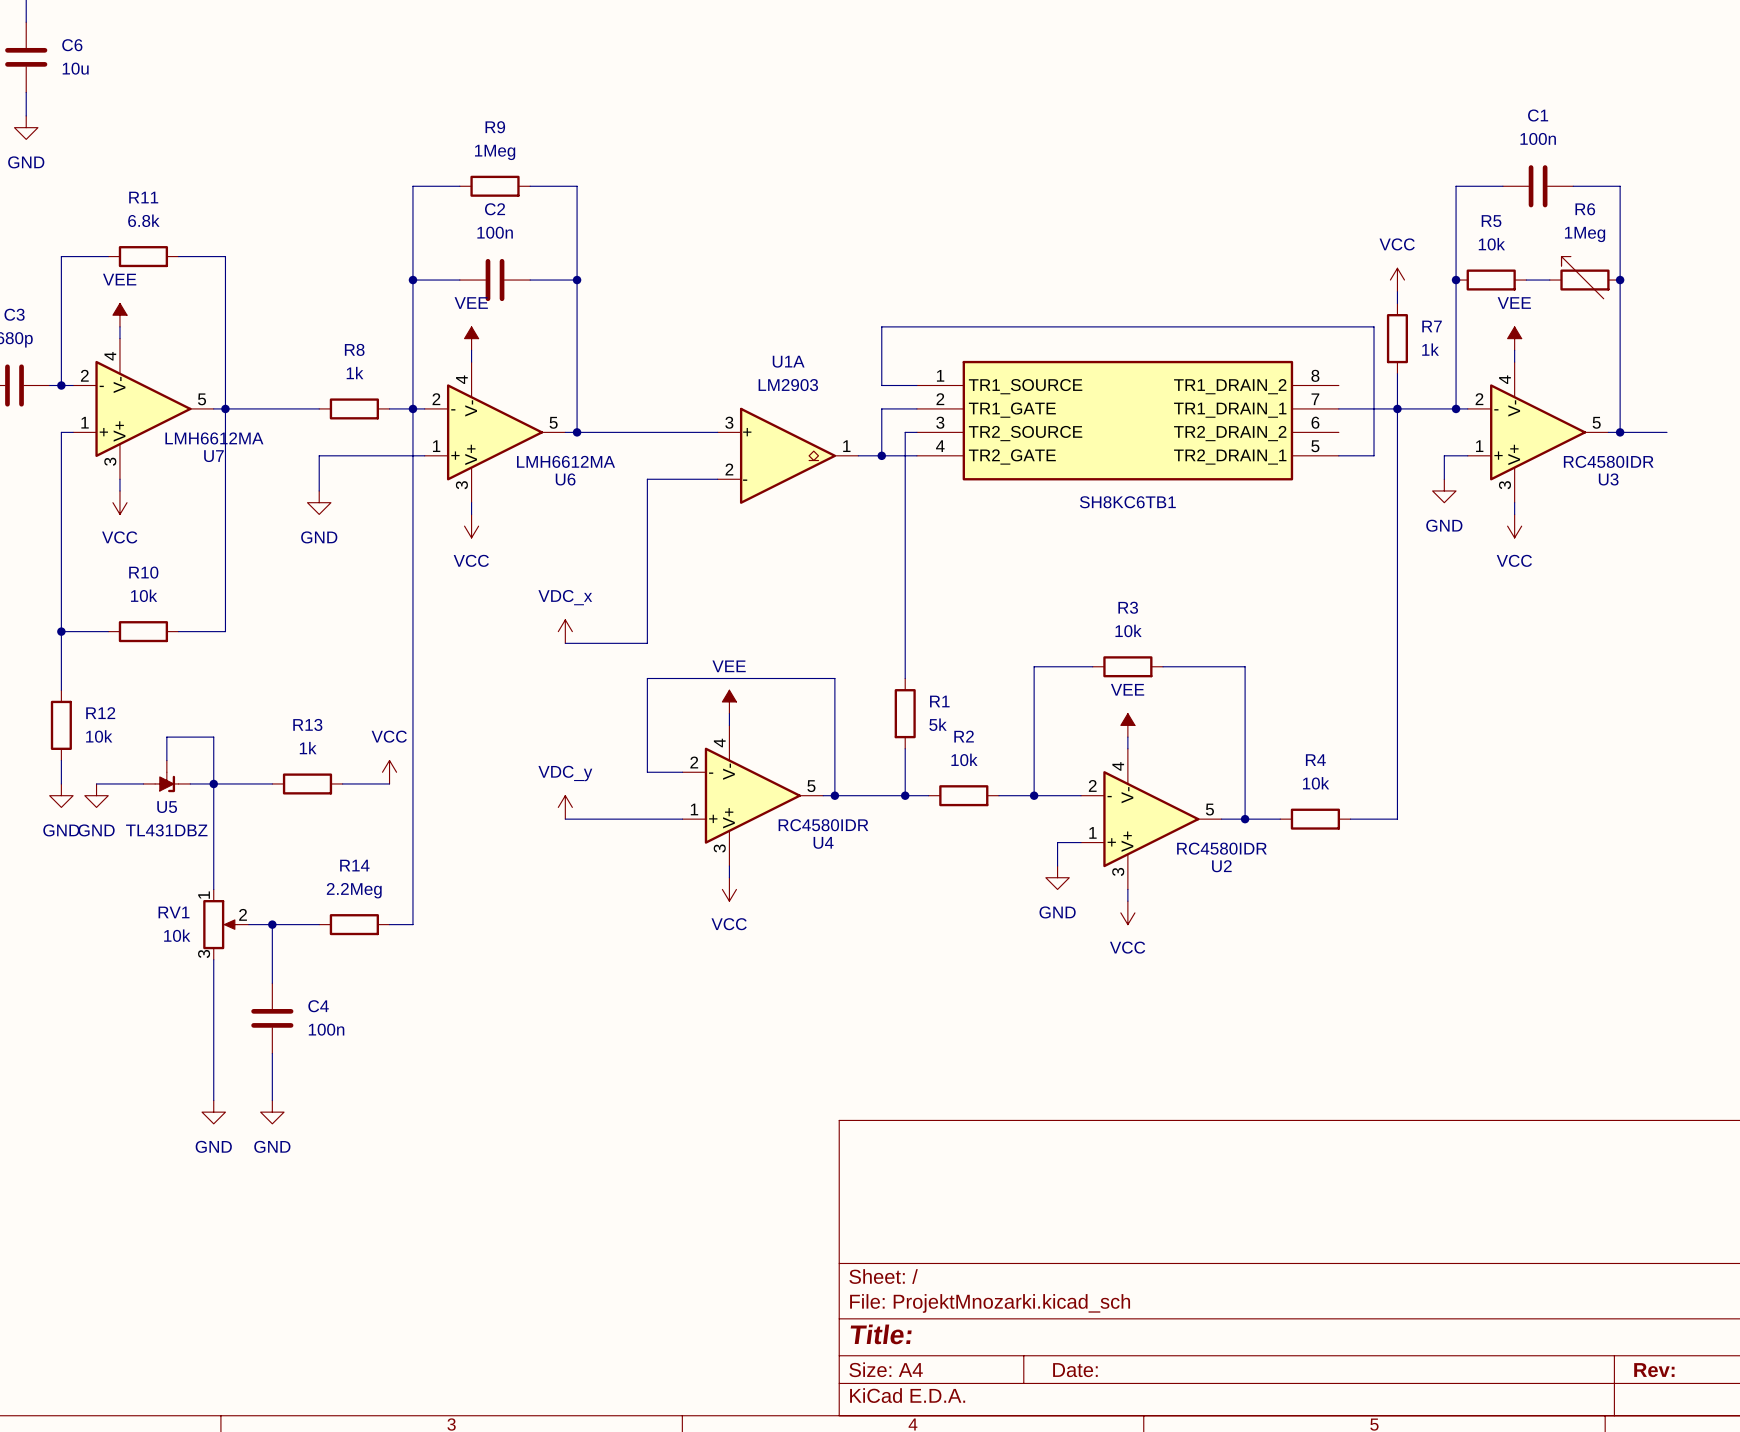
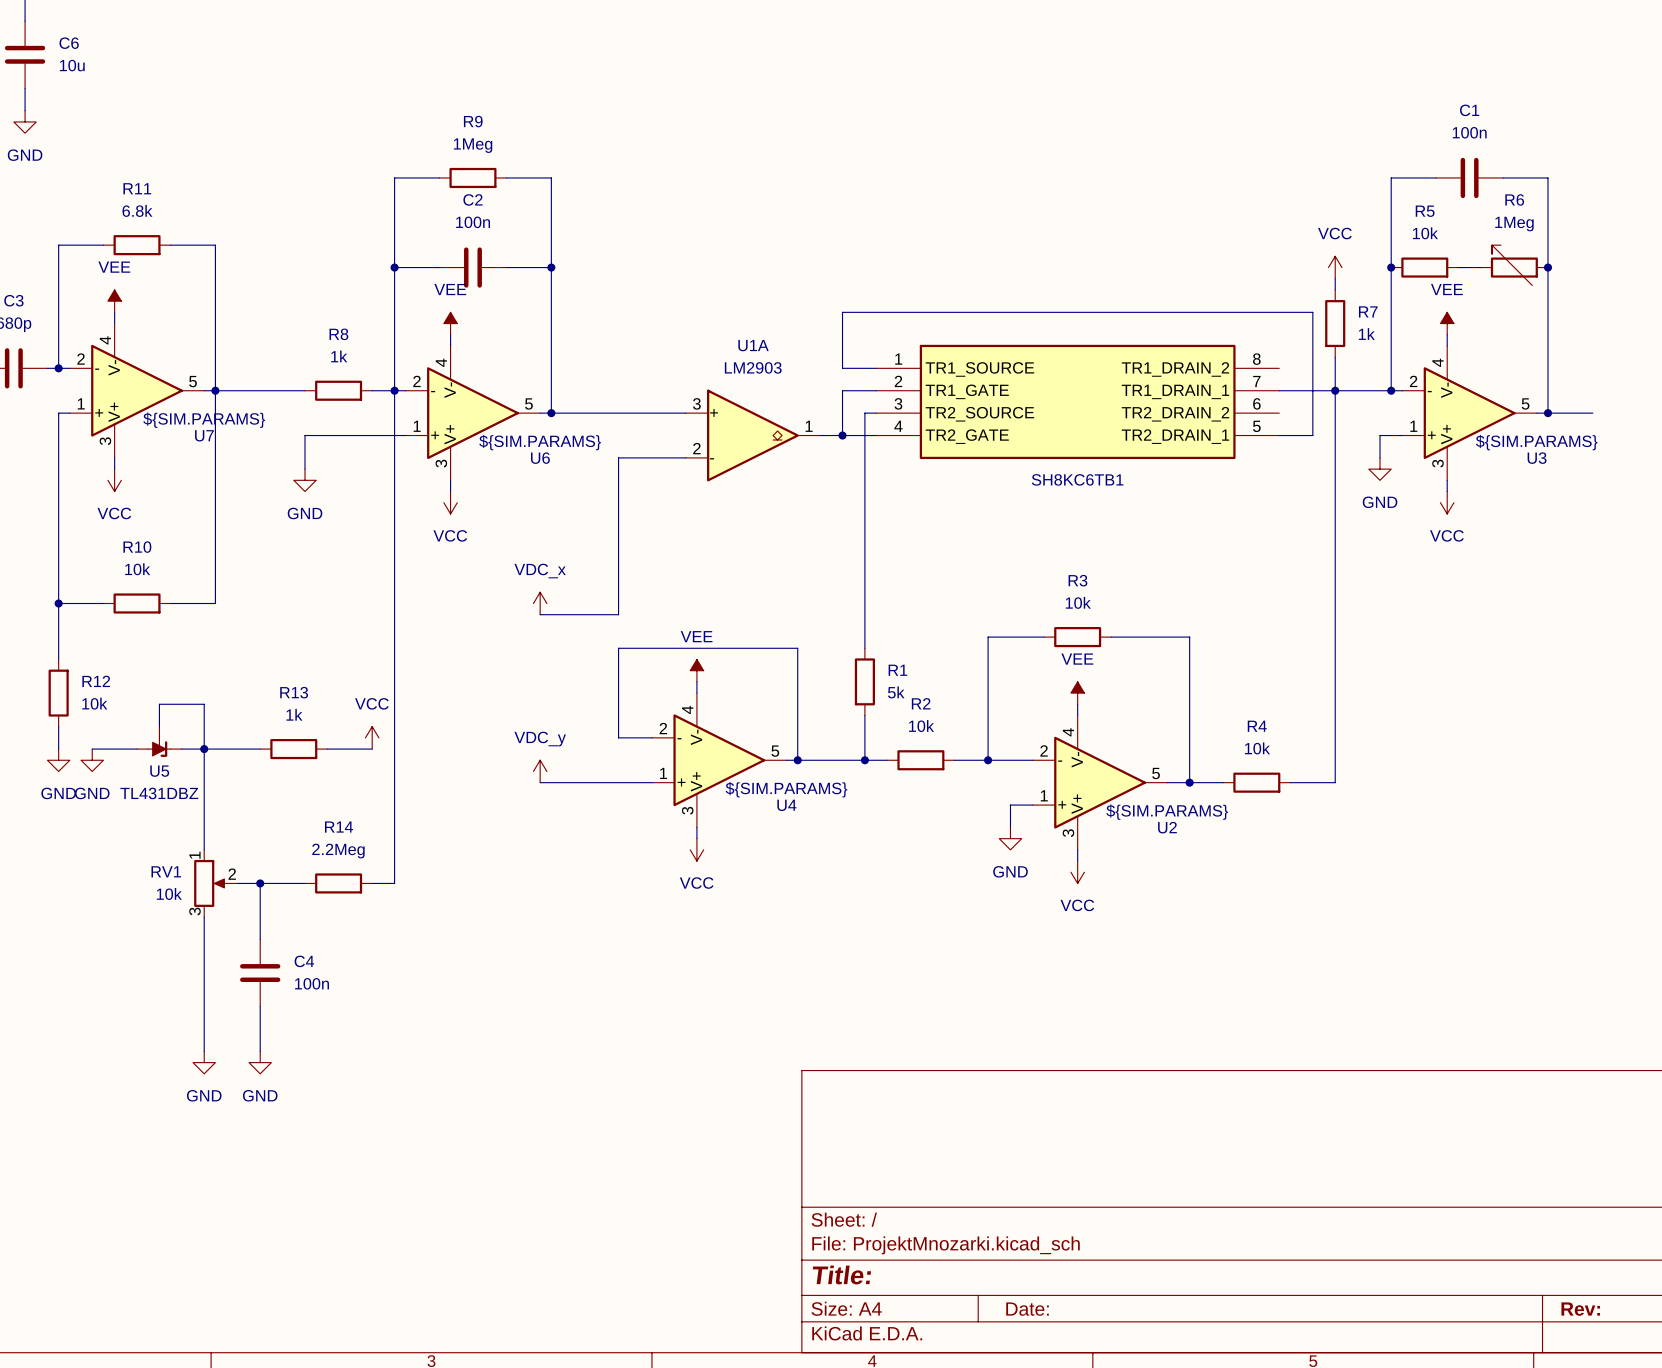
U7 value: LMH6612MA (214, 438) -> ${SIM.PARAMS} (204, 420)
U6 value: LMH6612MA (566, 461) -> ${SIM.PARAMS} (540, 442)
U3 value: RC4580IDR (1608, 461) -> ${SIM.PARAMS} (1536, 442)
U4 value: RC4580IDR (823, 825) -> ${SIM.PARAMS} (786, 789)
U2 value: RC4580IDR (1221, 848) -> ${SIM.PARAMS} (1167, 812)

